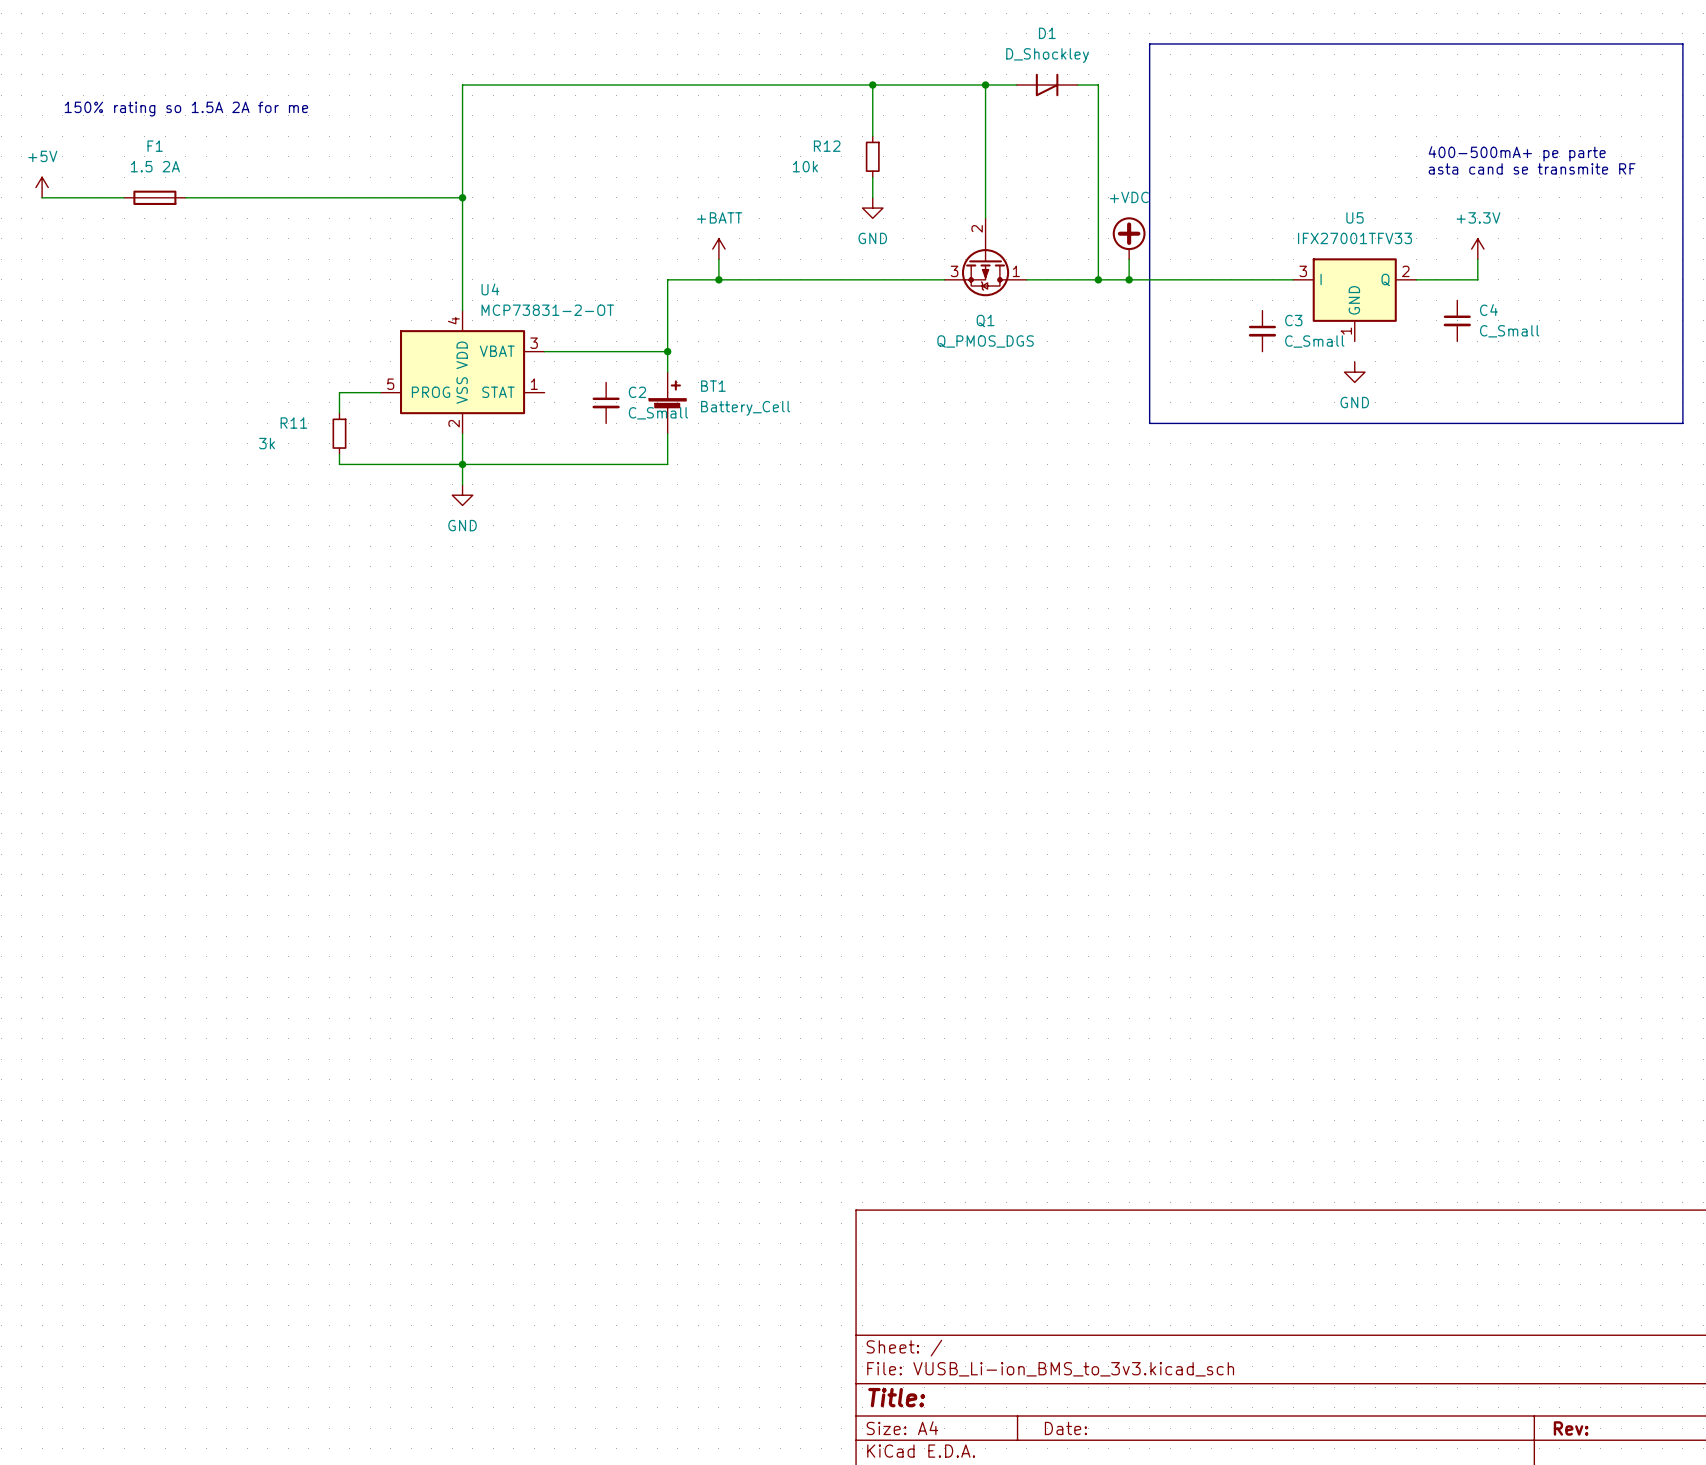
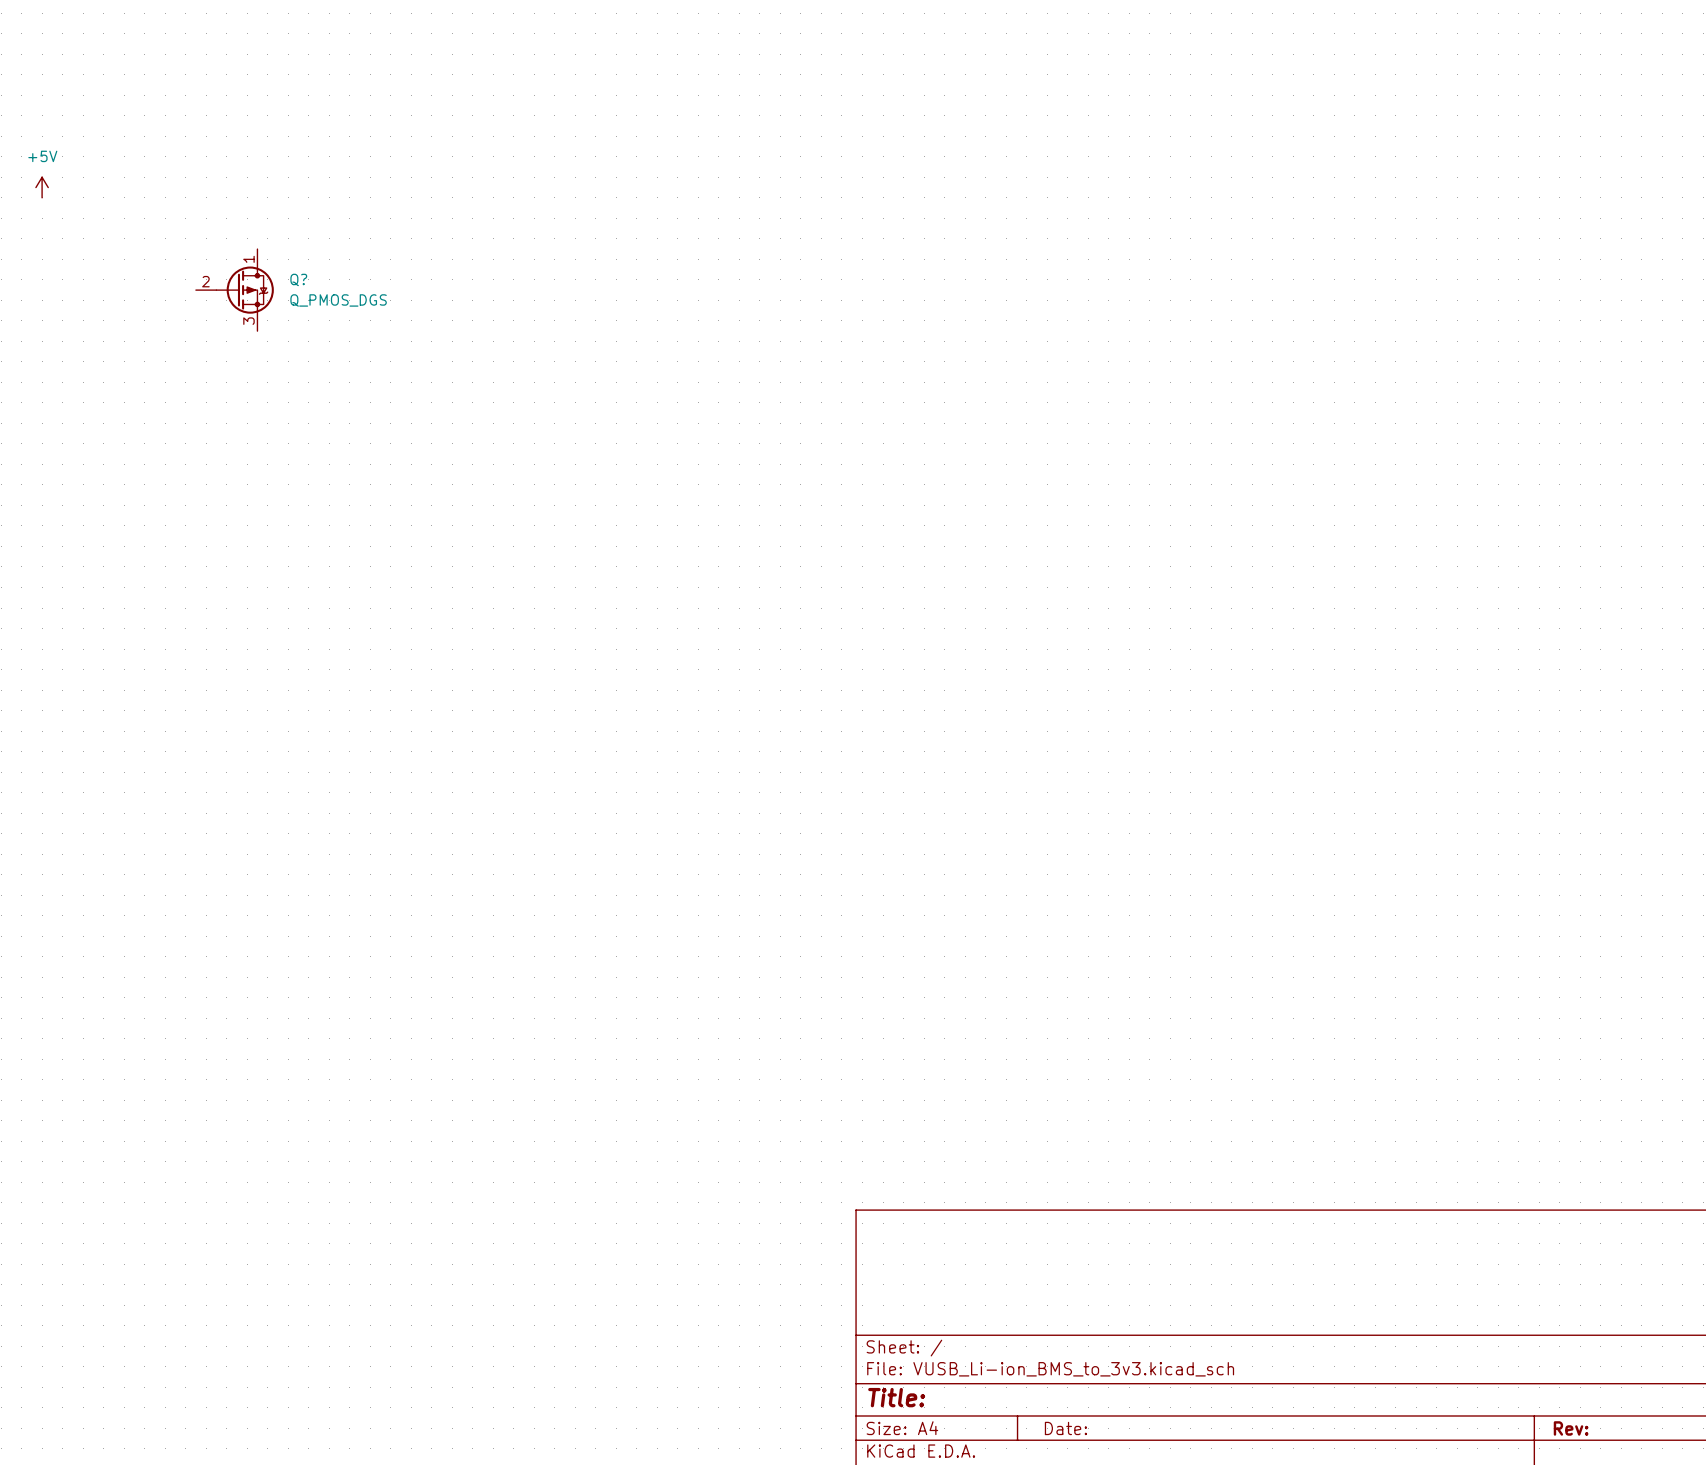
line: (1149, 43) (1682, 43) (1682, 423) (1149, 423) (1149, 43) -> none
wire: (872, 85) (872, 136) -> none
junction: (872, 85) -> none
wire: (985, 85) (985, 218) -> none
junction: (985, 85) -> none
wire: (1016, 85) (462, 85) (462, 310) -> none
D1: D_Shockley (1047, 85) -> none
wire: (1077, 85) (1098, 85) (1098, 279) -> none
text: 150% rating so 1.5A 2A for me (186, 109) -> none
text: 400-500mA+ pe parte (1517, 153) -> none
R12: 10k (872, 156) -> none
text: asta cand se transmite RF (1532, 168) -> none
wire: (872, 177) (872, 197) -> none
wire: (42, 197) (124, 197) -> none
F1: 1.5 2A (154, 197) -> none
wire: (185, 197) (462, 197) -> none
junction: (462, 197) -> none
power symbol: GND (872, 208) -> none
power symbol: +VDC (1129, 238) -> none
power symbol: +BATT (718, 249) -> none
power symbol: +3.3V (1477, 249) -> none
Q1: Q_PMOS_DGS (985, 257) -> none
wire: (718, 259) (718, 279) -> none
wire: (1129, 259) (1129, 279) -> none
wire: (1477, 259) (1477, 279) (1416, 279) -> none
junction: (718, 279) -> none
wire: (944, 279) (667, 279) (667, 372) -> none
wire: (1026, 279) (1293, 279) -> none
junction: (1098, 279) -> none
junction: (1129, 279) -> none
Q?: none -> Q_PMOS_DGS (234, 290)
U5: IFX27001TFV33 (1354, 299) -> none
C4: C_Small (1457, 320) -> none
C3: C_Small (1262, 331) -> none
wire: (544, 351) (667, 351) -> none
junction: (667, 351) -> none
U4: MCP73831-2-OT (462, 372) -> none
power symbol: GND (1354, 372) -> none
wire: (380, 392) (339, 392) (339, 413) -> none
C2: C_Small (606, 402) -> none
BT1: Battery_Cell (667, 402) -> none
R11: 3k (339, 433) -> none
wire: (462, 433) (462, 484) -> none
wire: (667, 433) (667, 464) (339, 464) (339, 454) -> none
junction: (462, 464) -> none
power symbol: GND (462, 495) -> none

